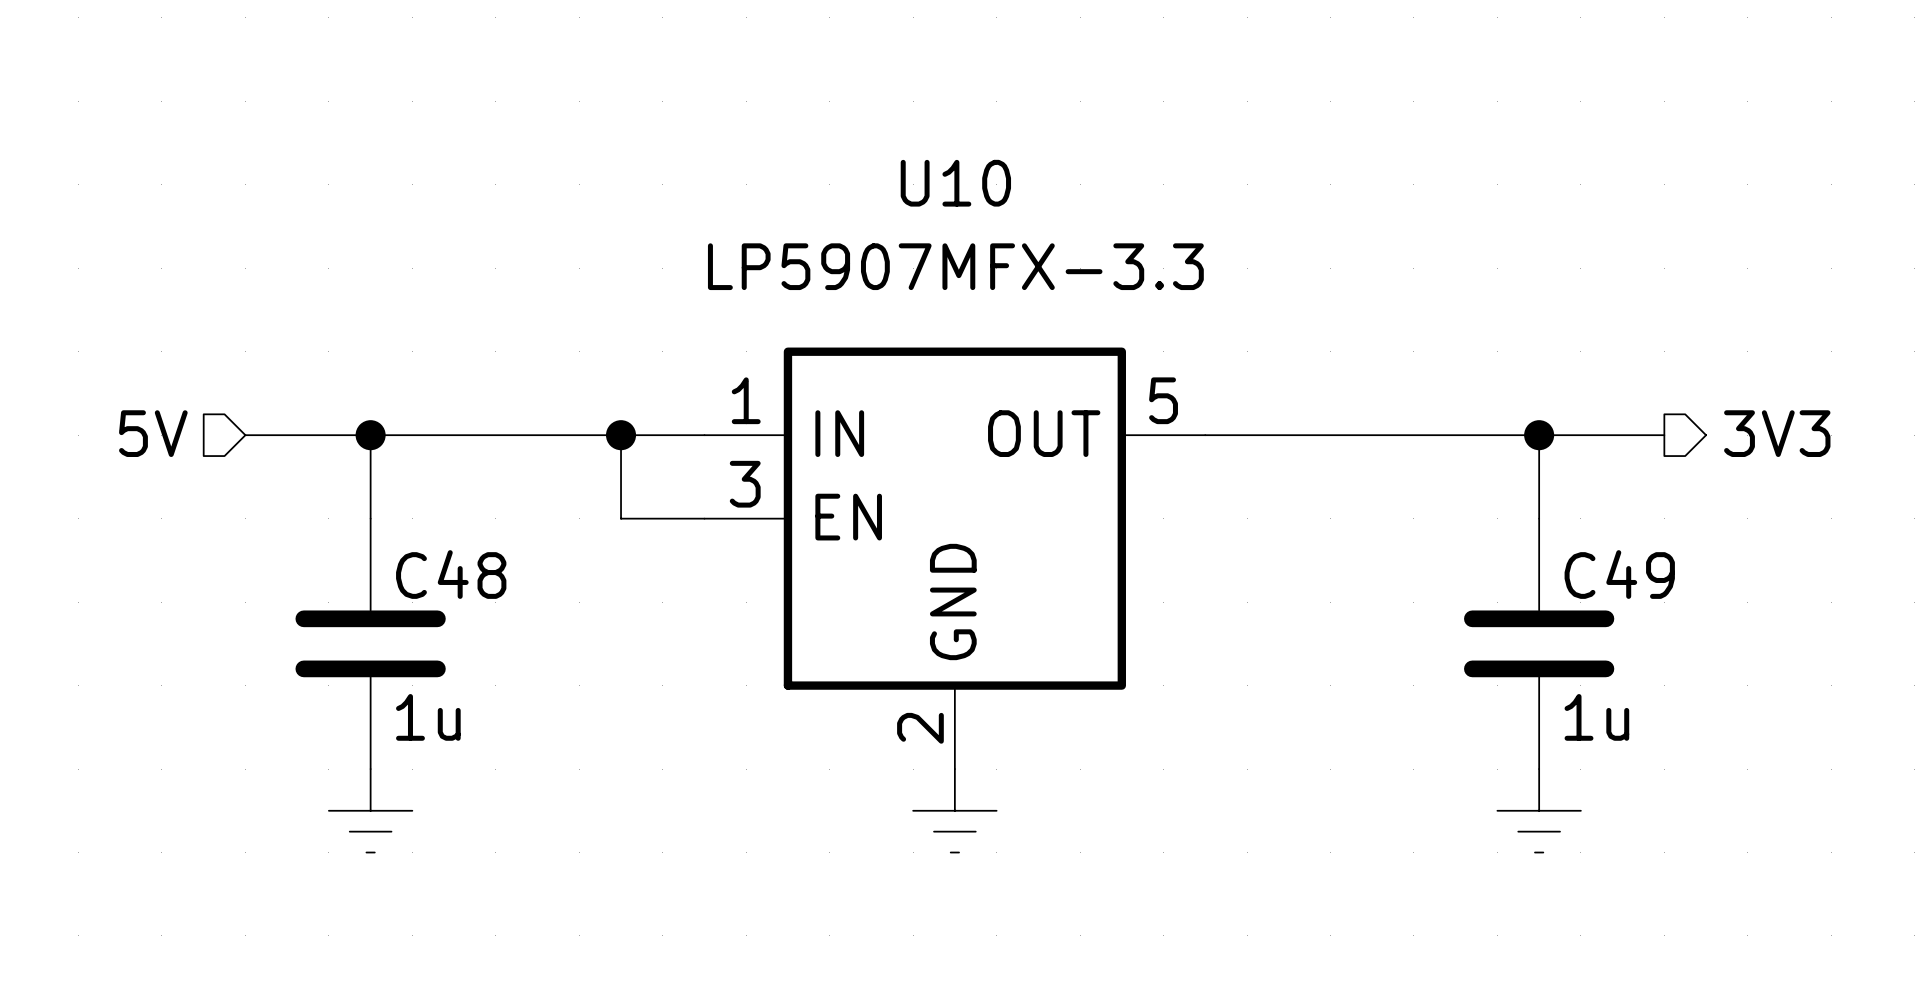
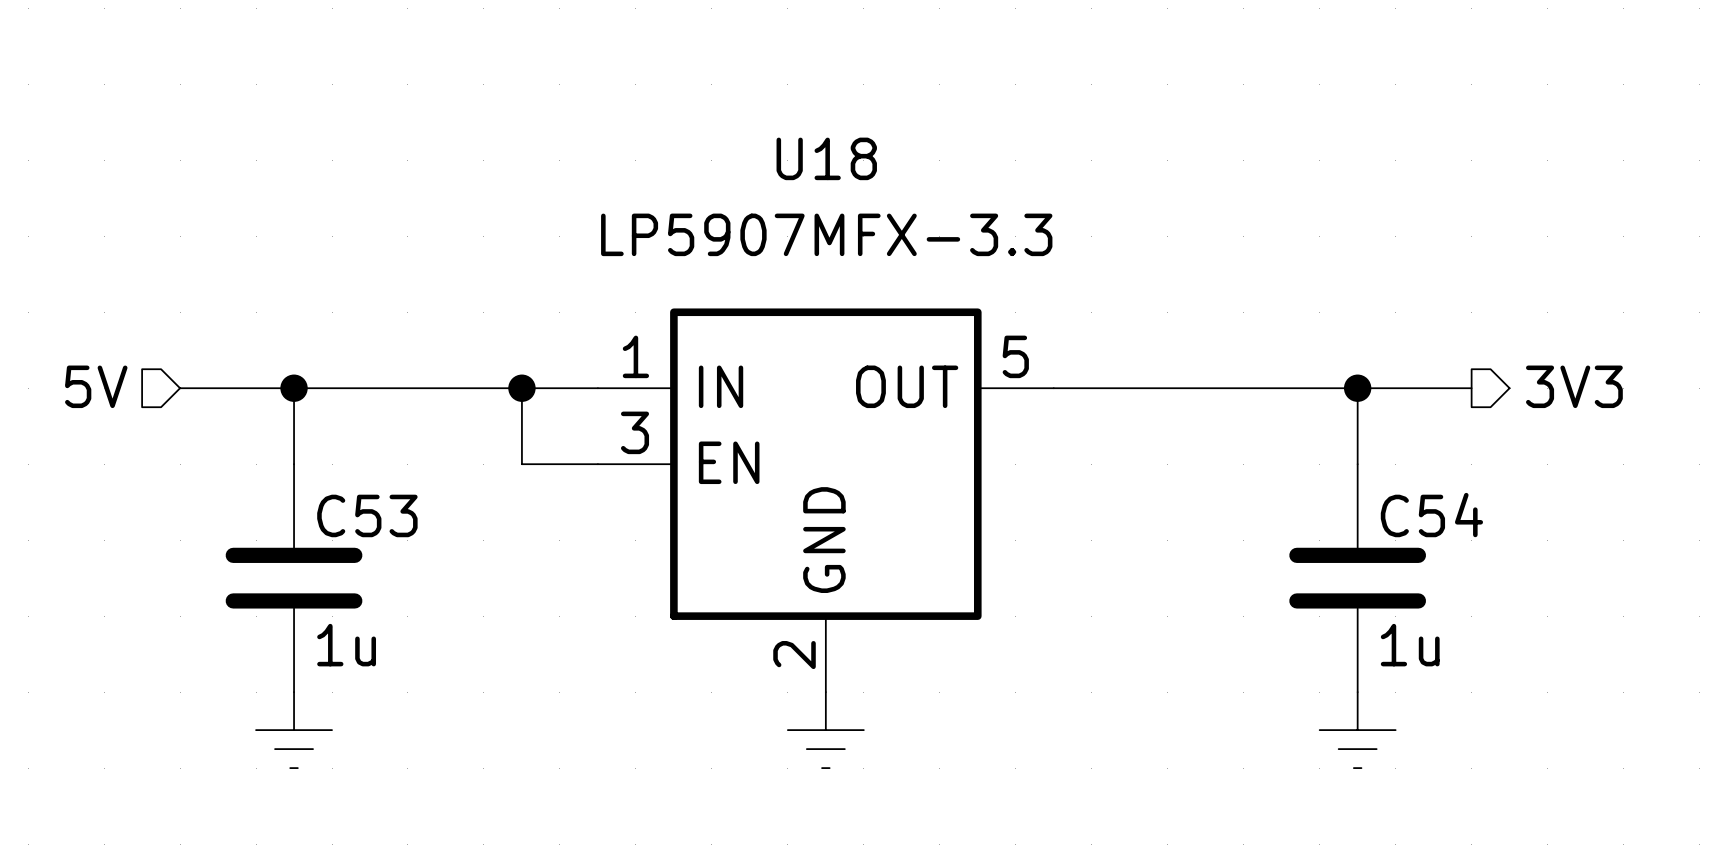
U10 name: U10 (955, 183) -> U18 (826, 158)
C48 name: C48 (451, 574) -> C53 (367, 515)
C49 name: C49 (1619, 574) -> C54 (1431, 515)

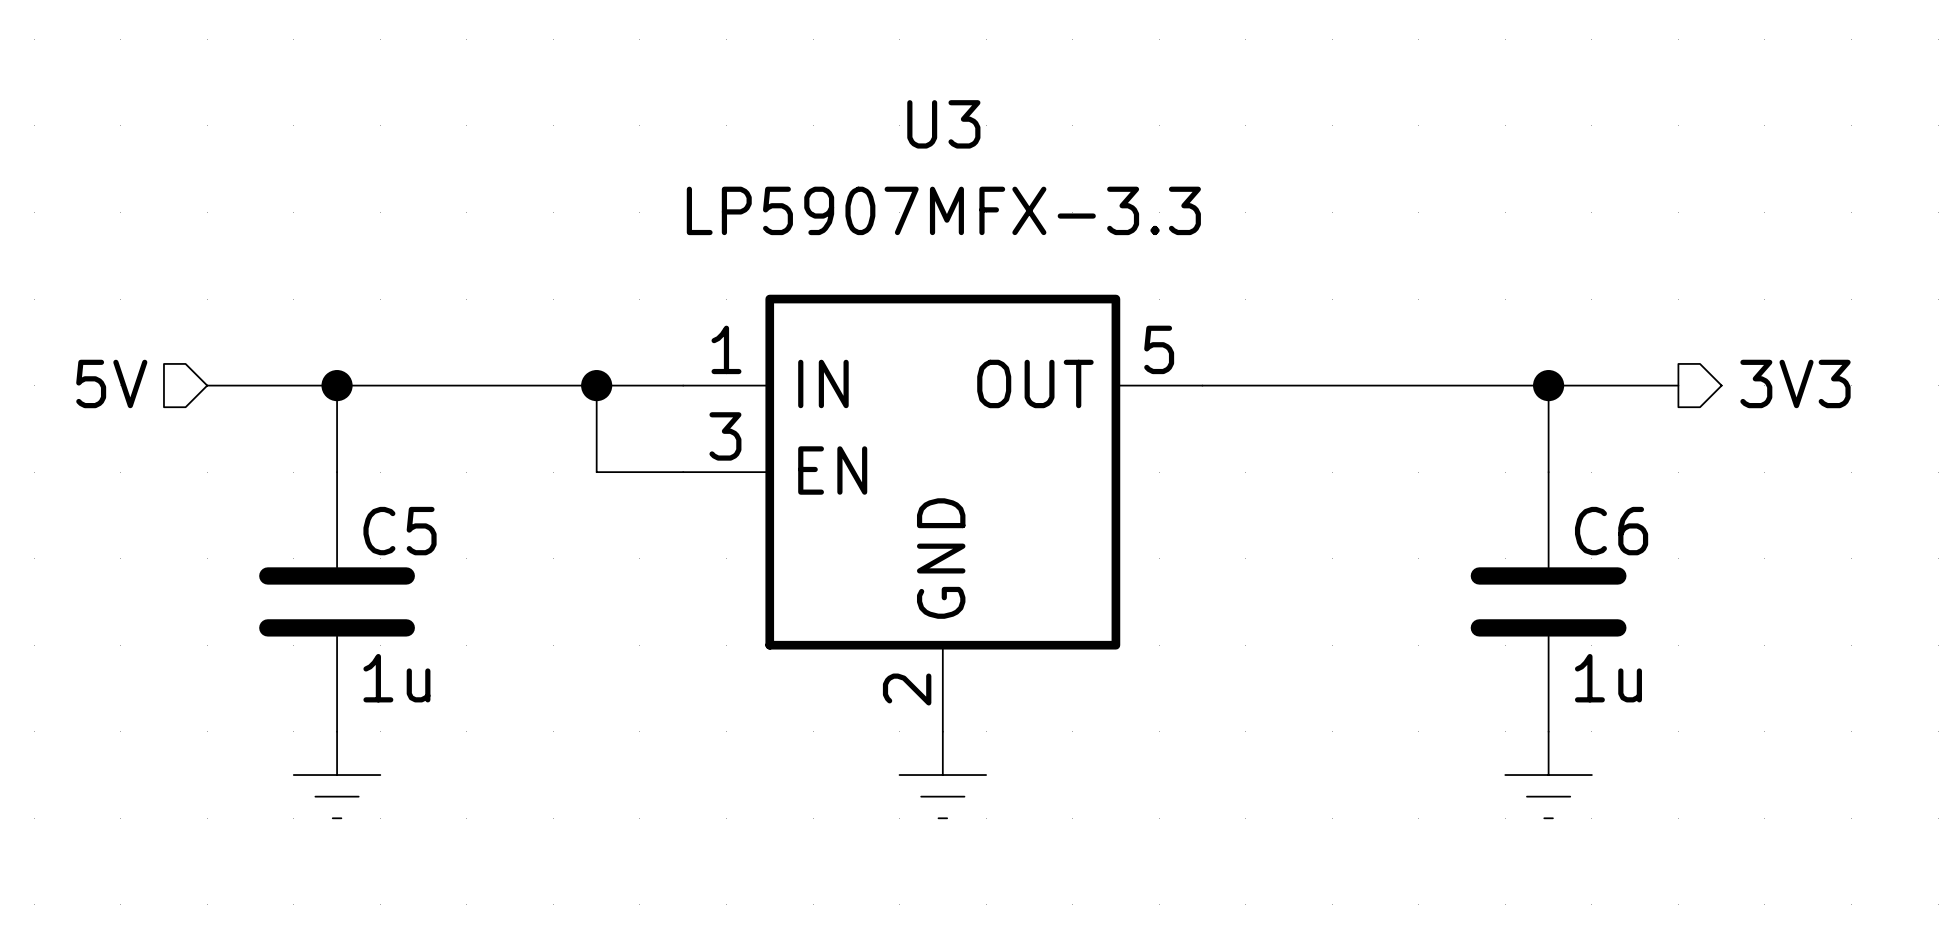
U18 name: U18 (826, 158) -> U3 (943, 124)
C53 name: C53 (367, 515) -> C5 (400, 531)
C54 name: C54 (1431, 515) -> C6 (1611, 531)

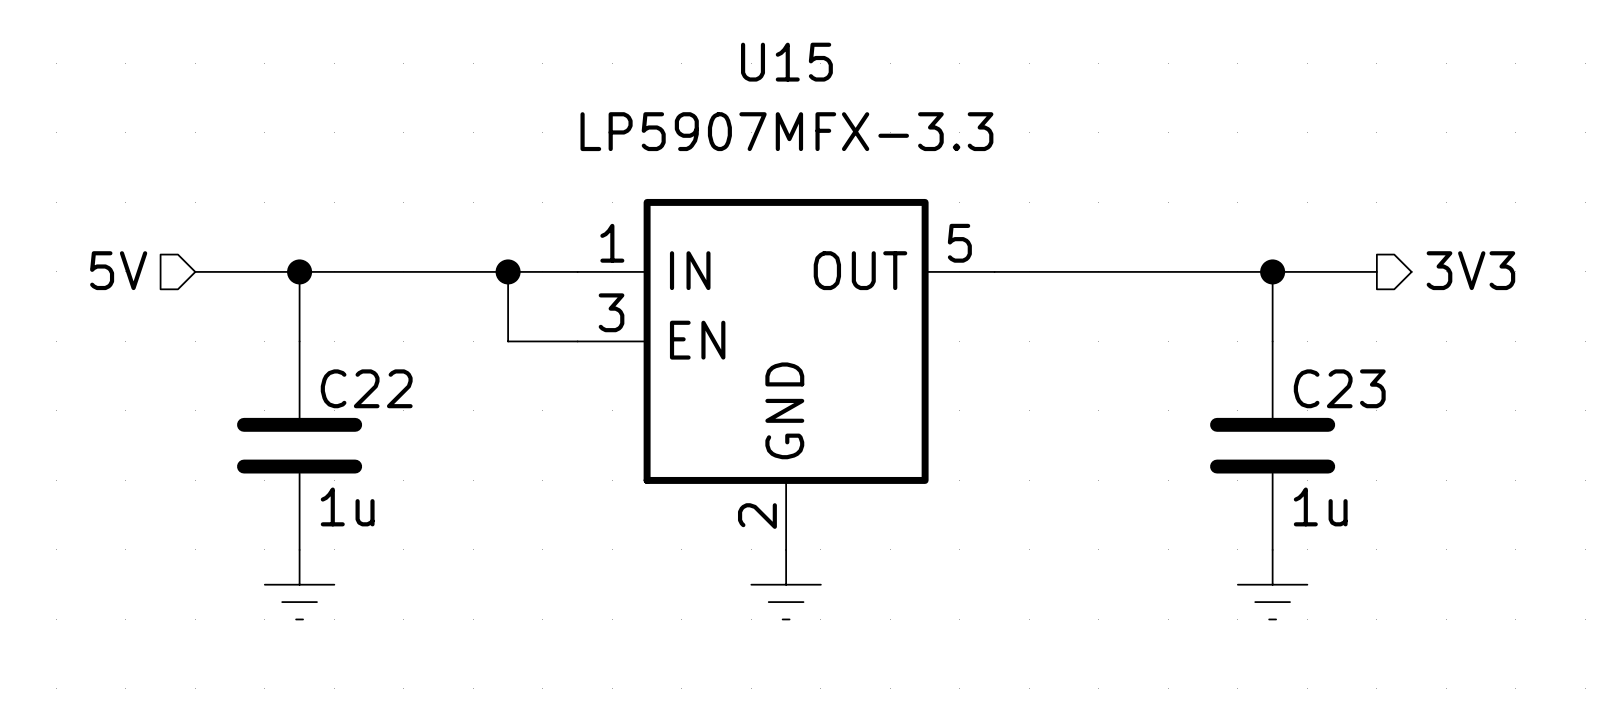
U3 name: U3 (943, 124) -> U15 (786, 62)
C5 name: C5 (400, 531) -> C22 (366, 388)
C6 name: C6 (1611, 531) -> C23 (1339, 388)

